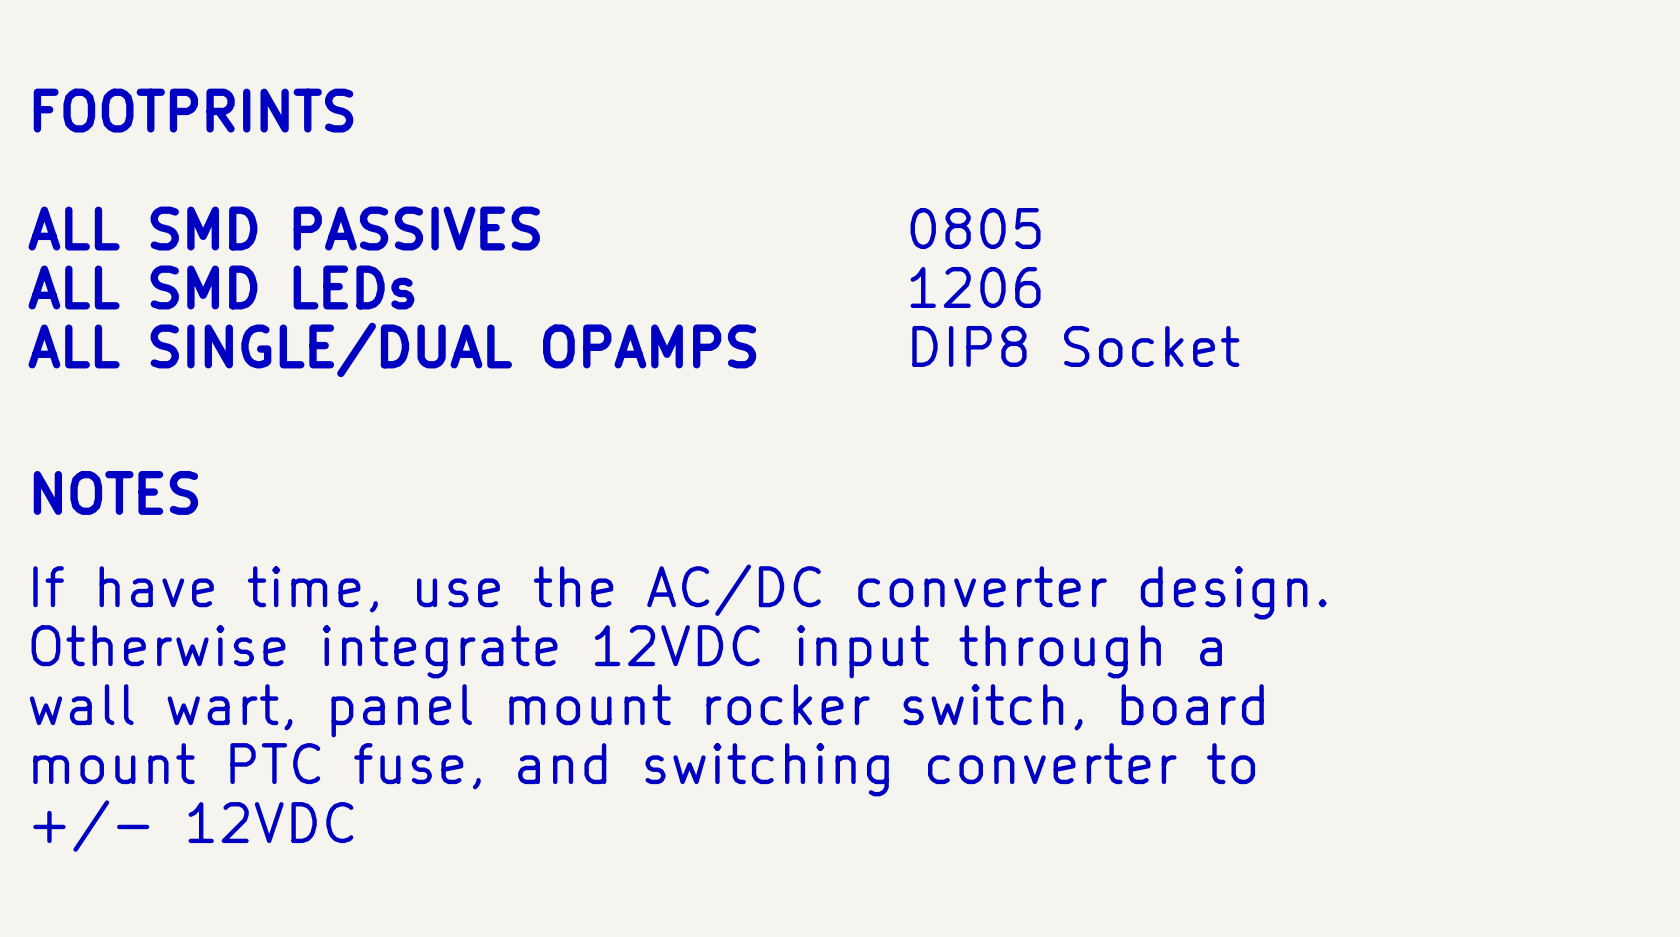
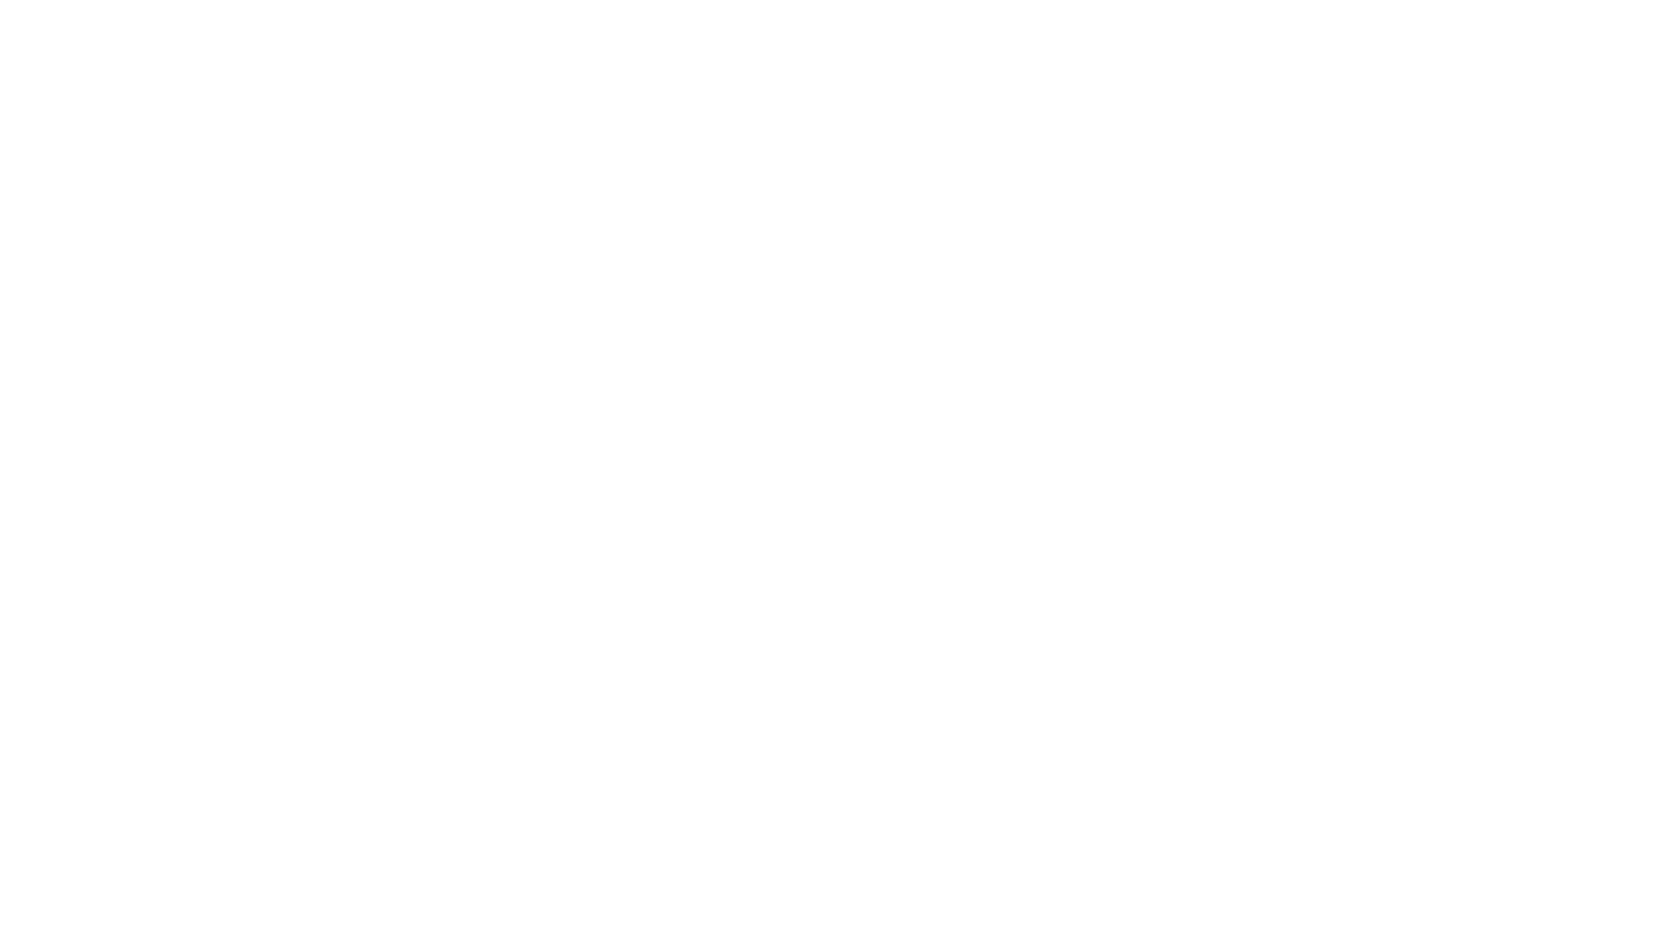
text: FOOTPRINTS (193, 110) -> none
text: ALL SMD PASSIVES (284, 228) -> none
text: 0805 (975, 228) -> none
text: ALL SMD LEDs (221, 287) -> none
text: 1206 (975, 287) -> none
text: DIP8 Socket (1075, 346) -> none
text: ALL SINGLE/DUAL OPAMPS (392, 349) -> none
text: NOTES (115, 492) -> none
text: If have time, use the AC/DC converter design. (679, 591) -> none
text: Otherwise integrate 12VDC input through a (626, 651) -> none
text: wall wart, panel mount rocker switch, board (646, 710) -> none
text: mount PTC fuse, and switching converter to (644, 769) -> none
text: +/- 12VDC (193, 826) -> none

